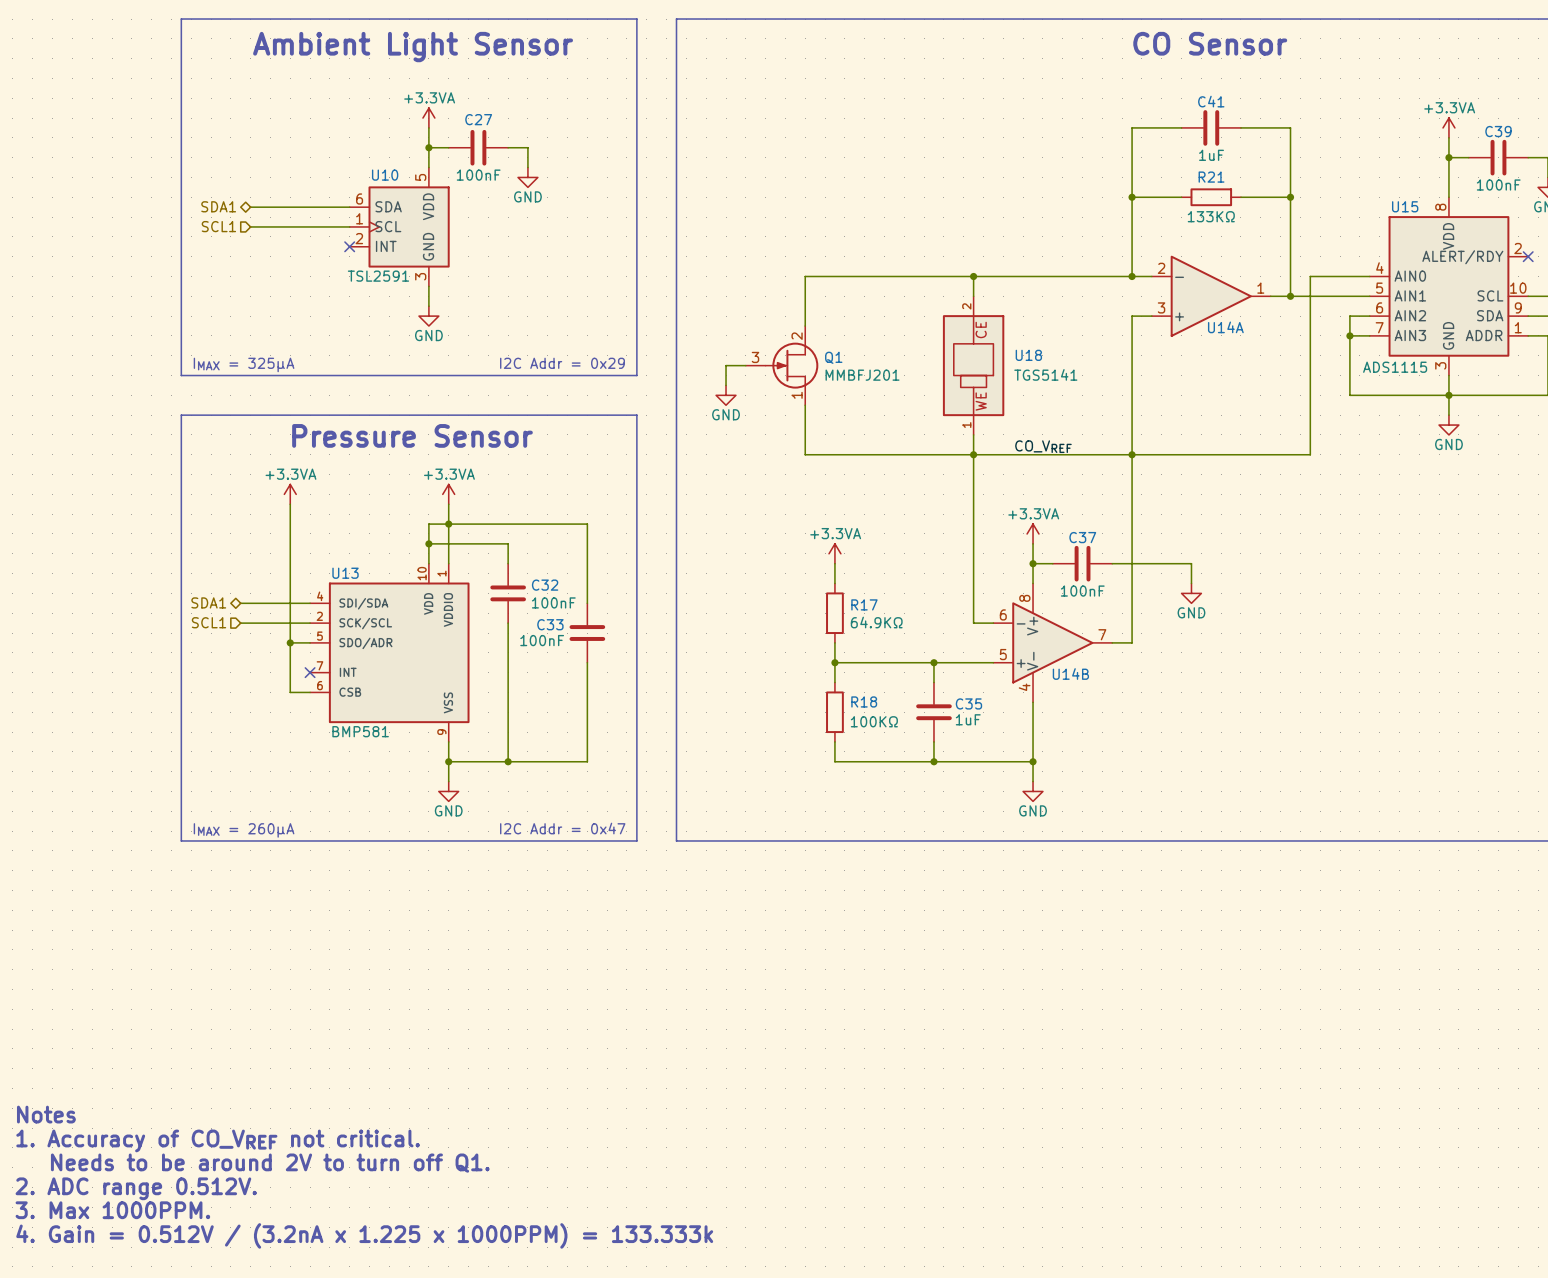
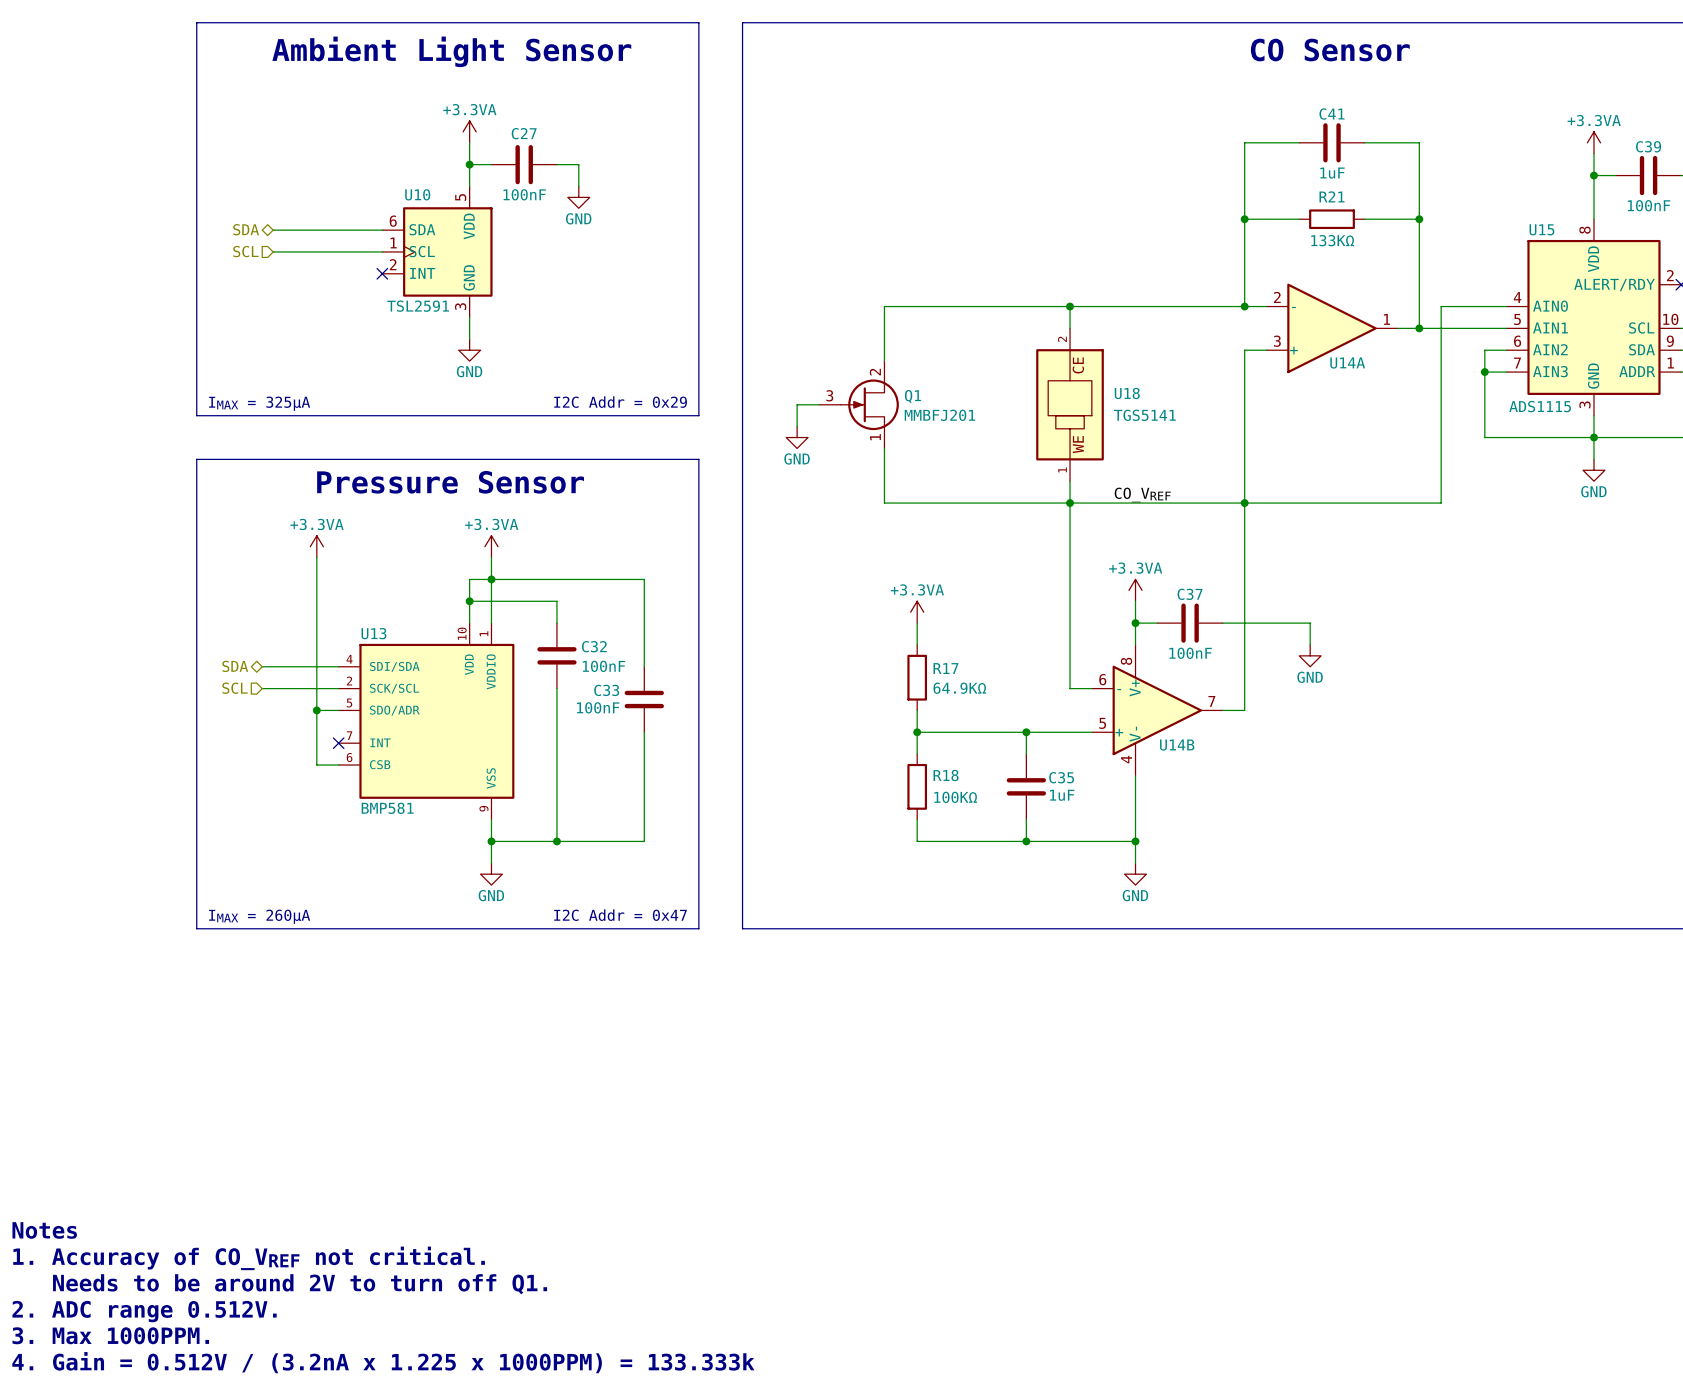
hierarchical label: SDA1 (218, 206) -> SDA (246, 229)
hierarchical label: SCL1 (218, 226) -> SCL (245, 251)
hierarchical label: SDA1 (208, 602) -> SDA (235, 666)
hierarchical label: SCL1 (208, 622) -> SCL (235, 688)

